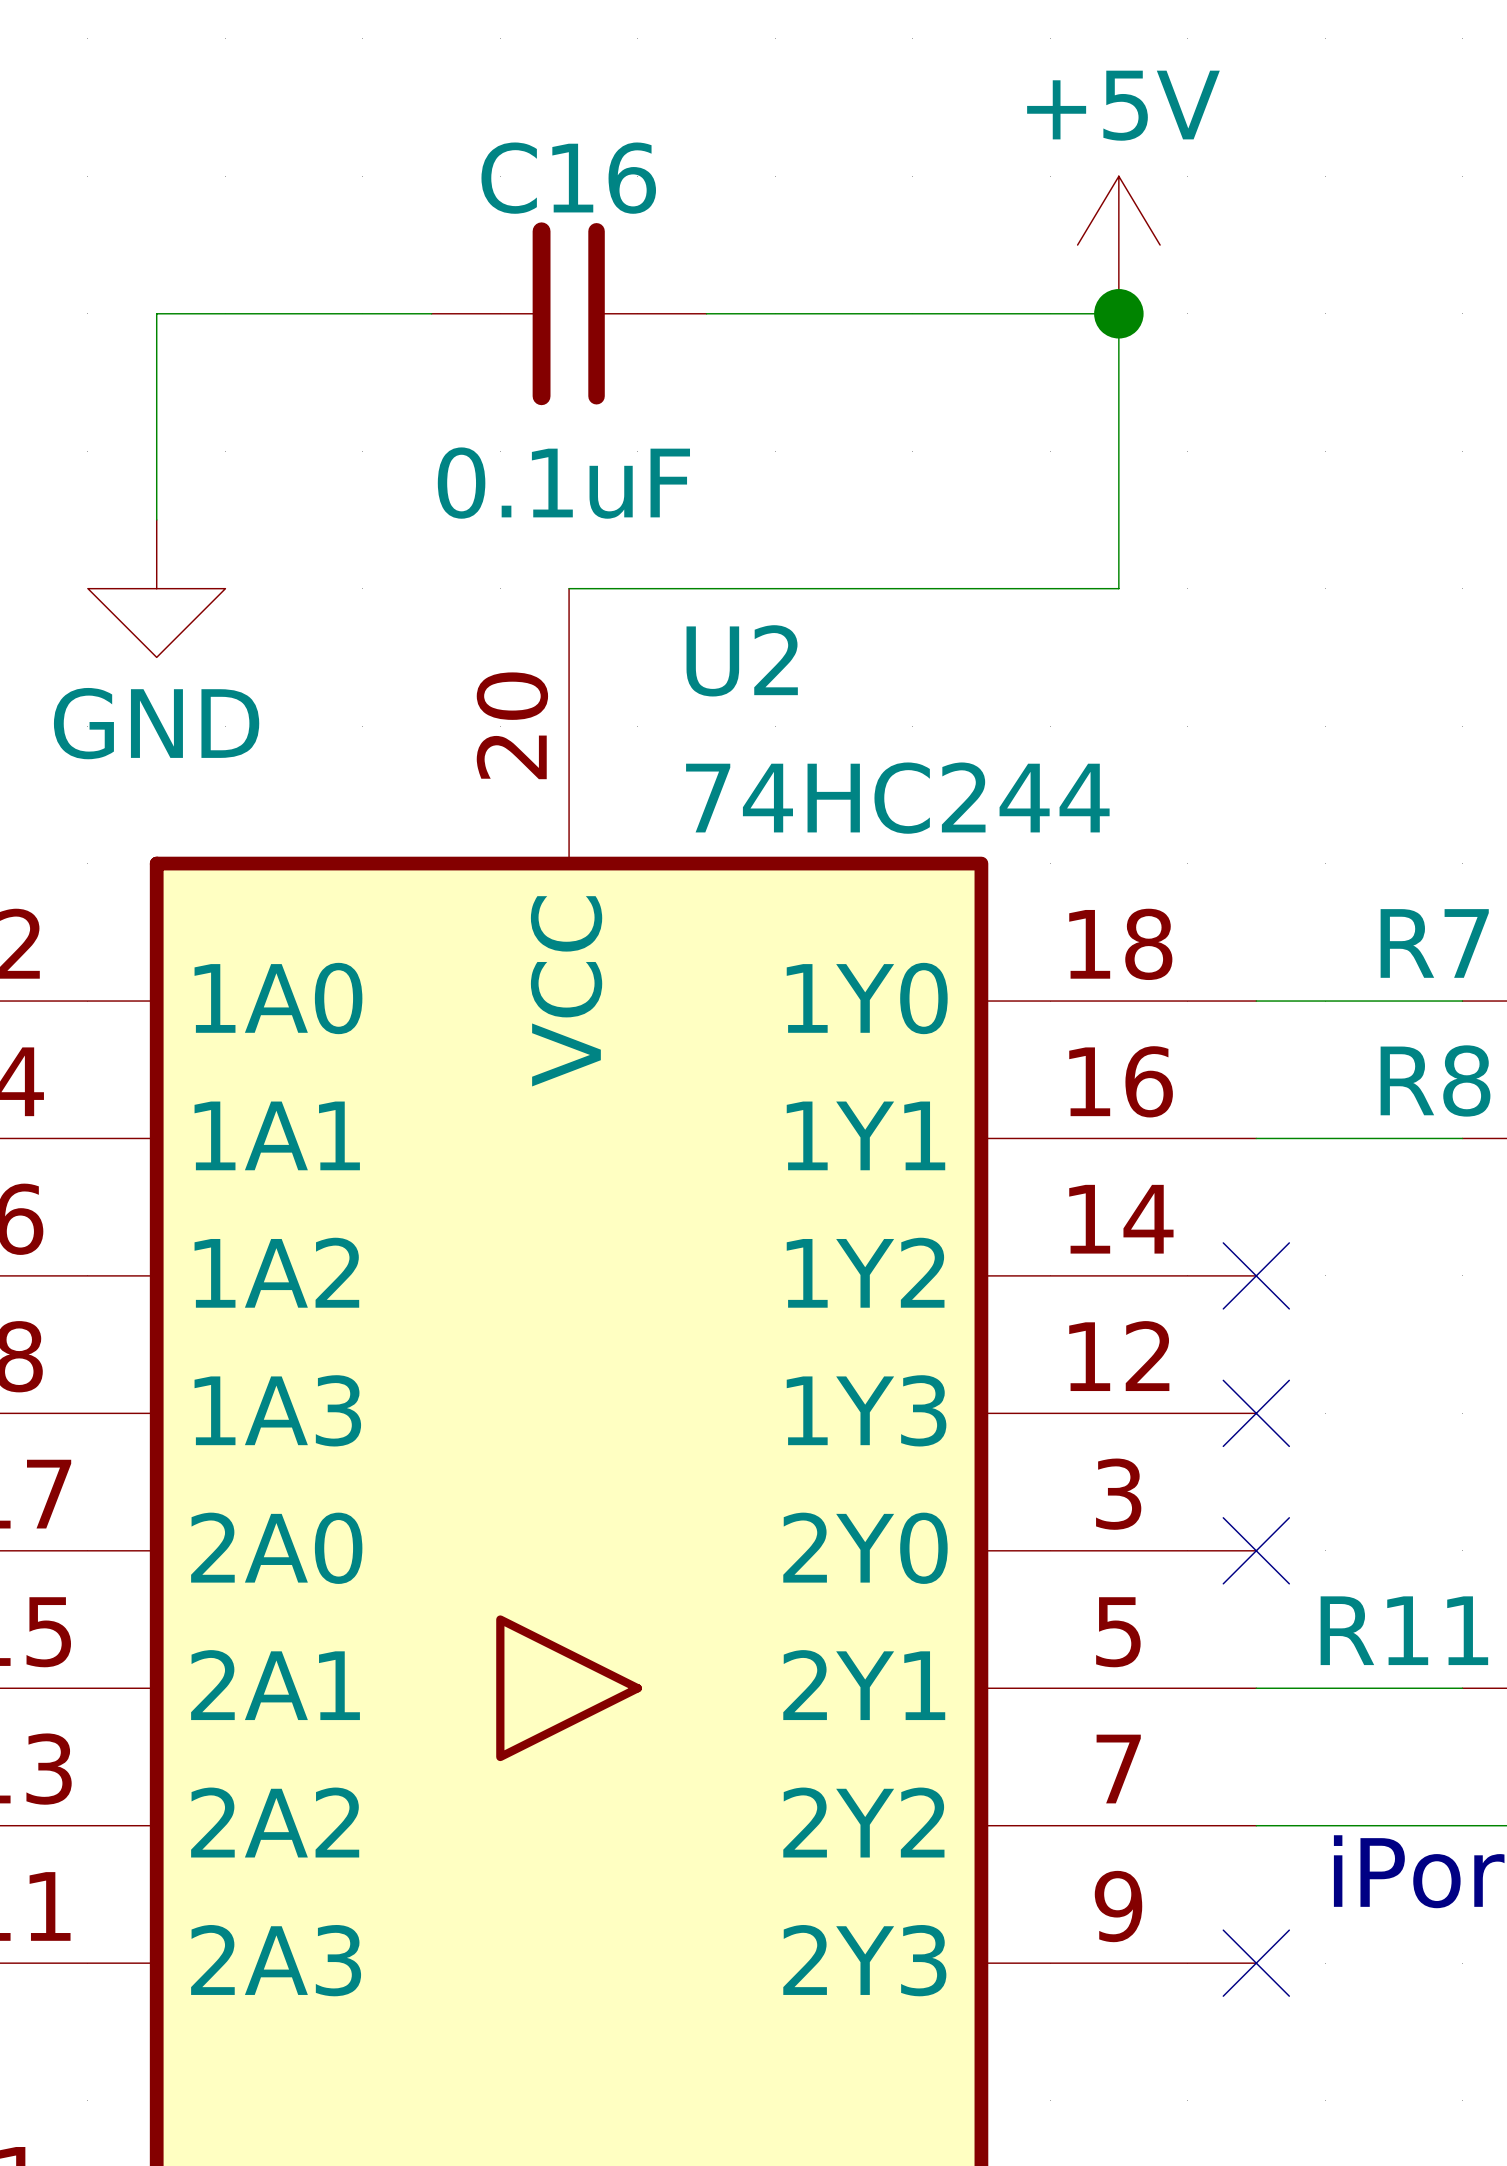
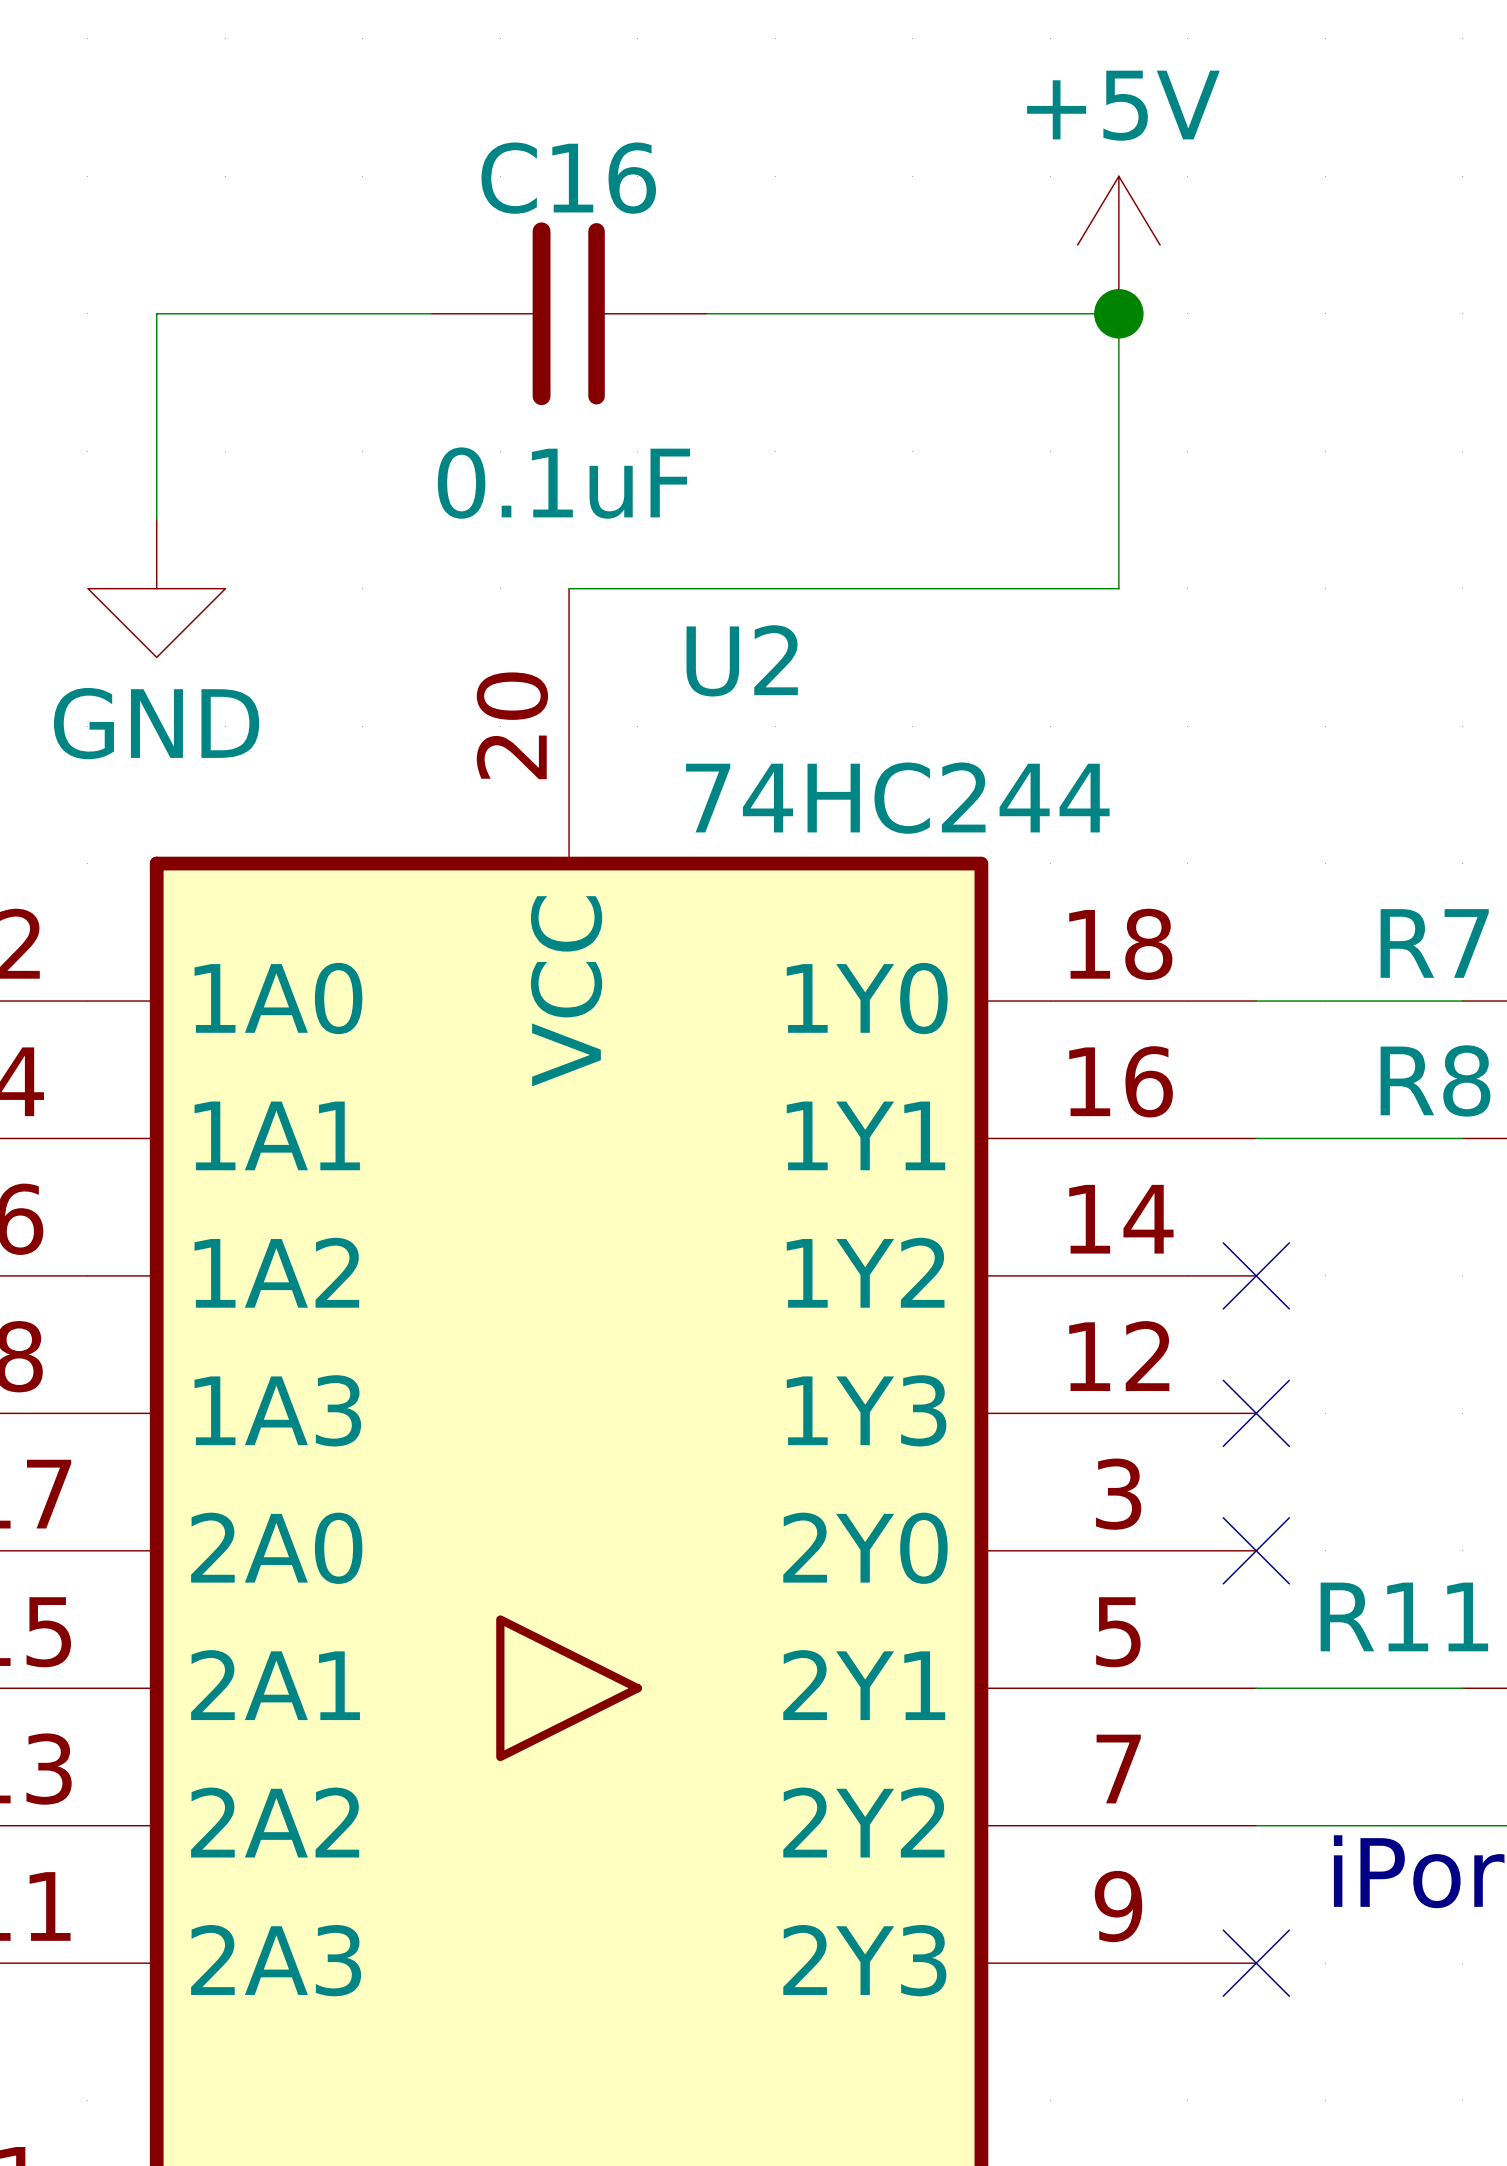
R11 name position: R11 (1404, 1630) -> R11 (1404, 1616)

